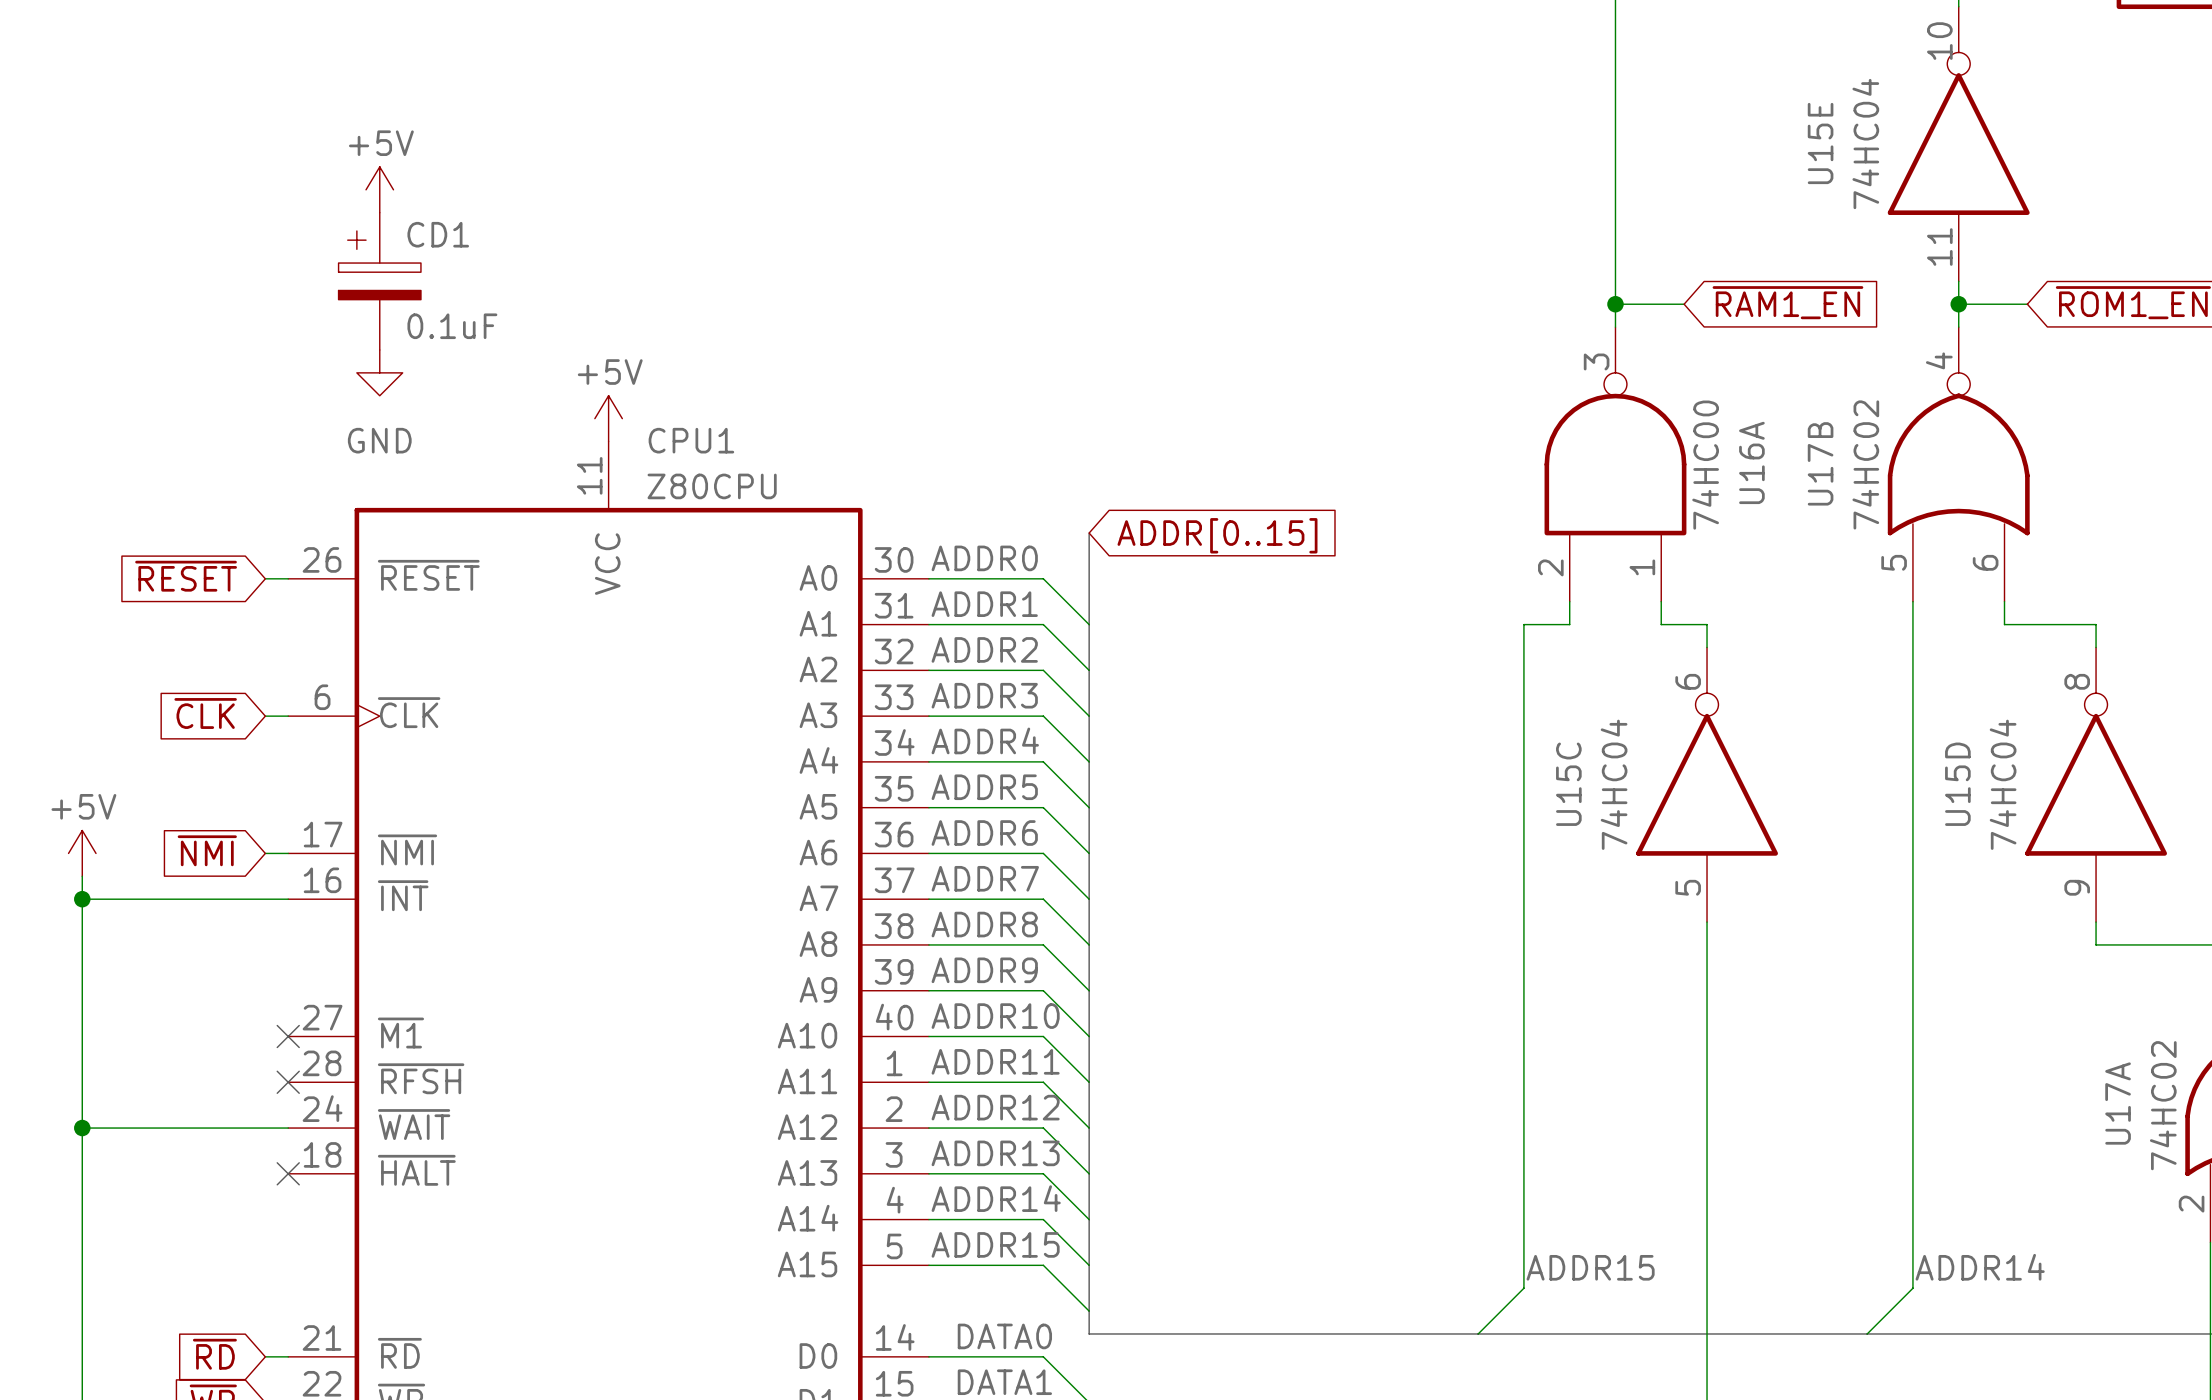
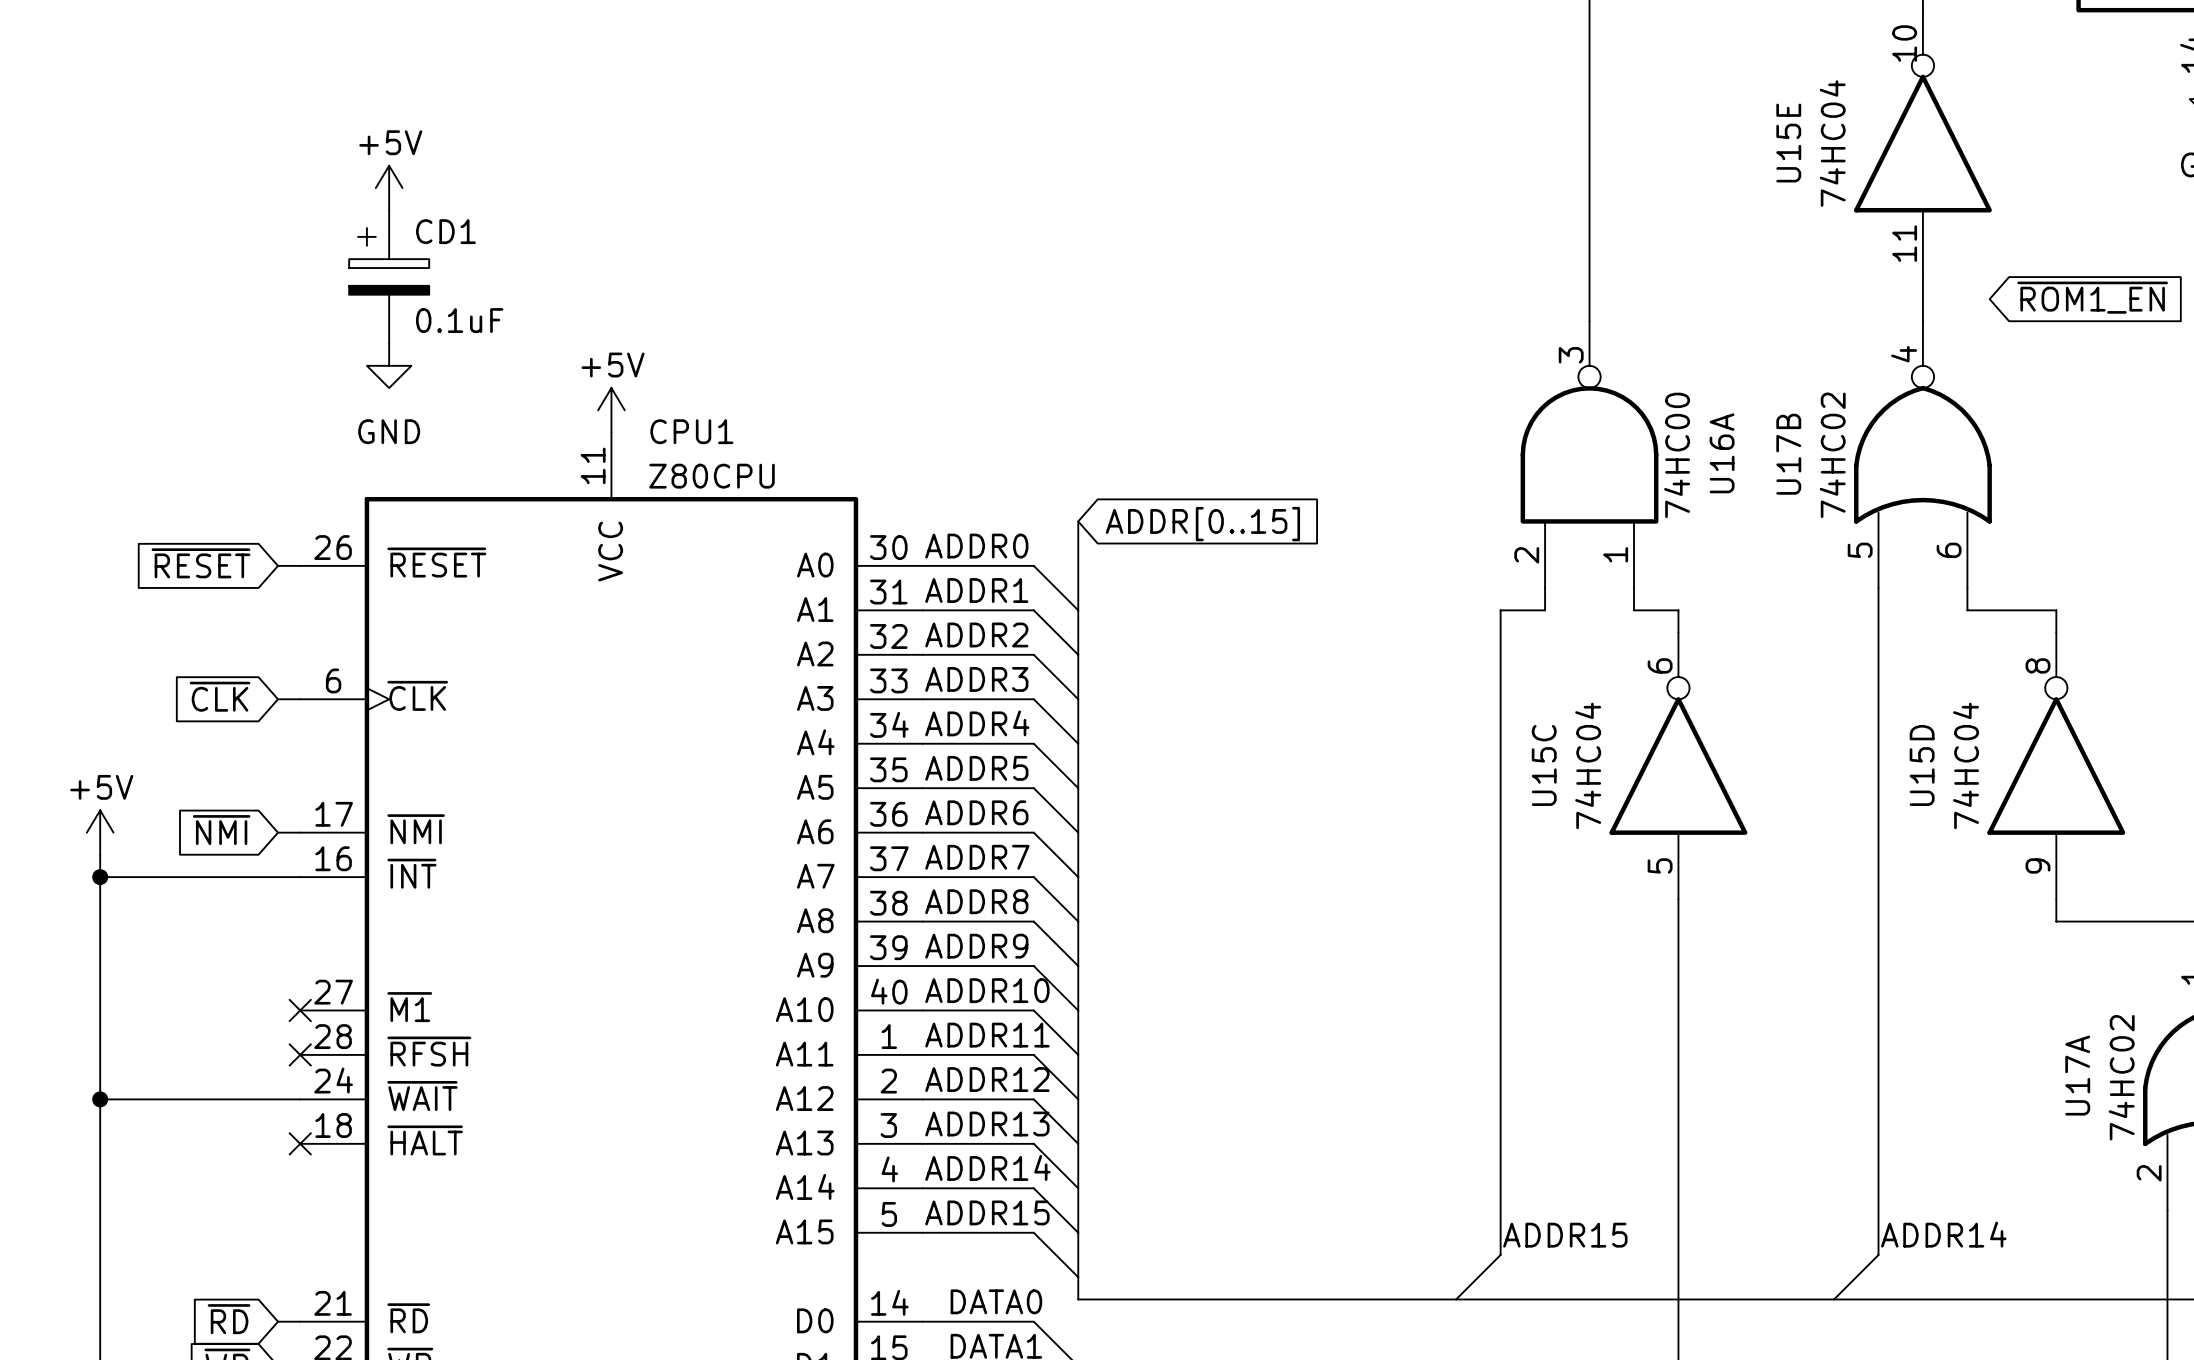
global label: ~{RAM1_EN} (1787, 302) -> none
wire: (1615, 304) (1684, 304) -> none
junction: (1615, 304) -> none
wire: (1958, 304) (2027, 304) -> none
junction: (1958, 304) -> none

